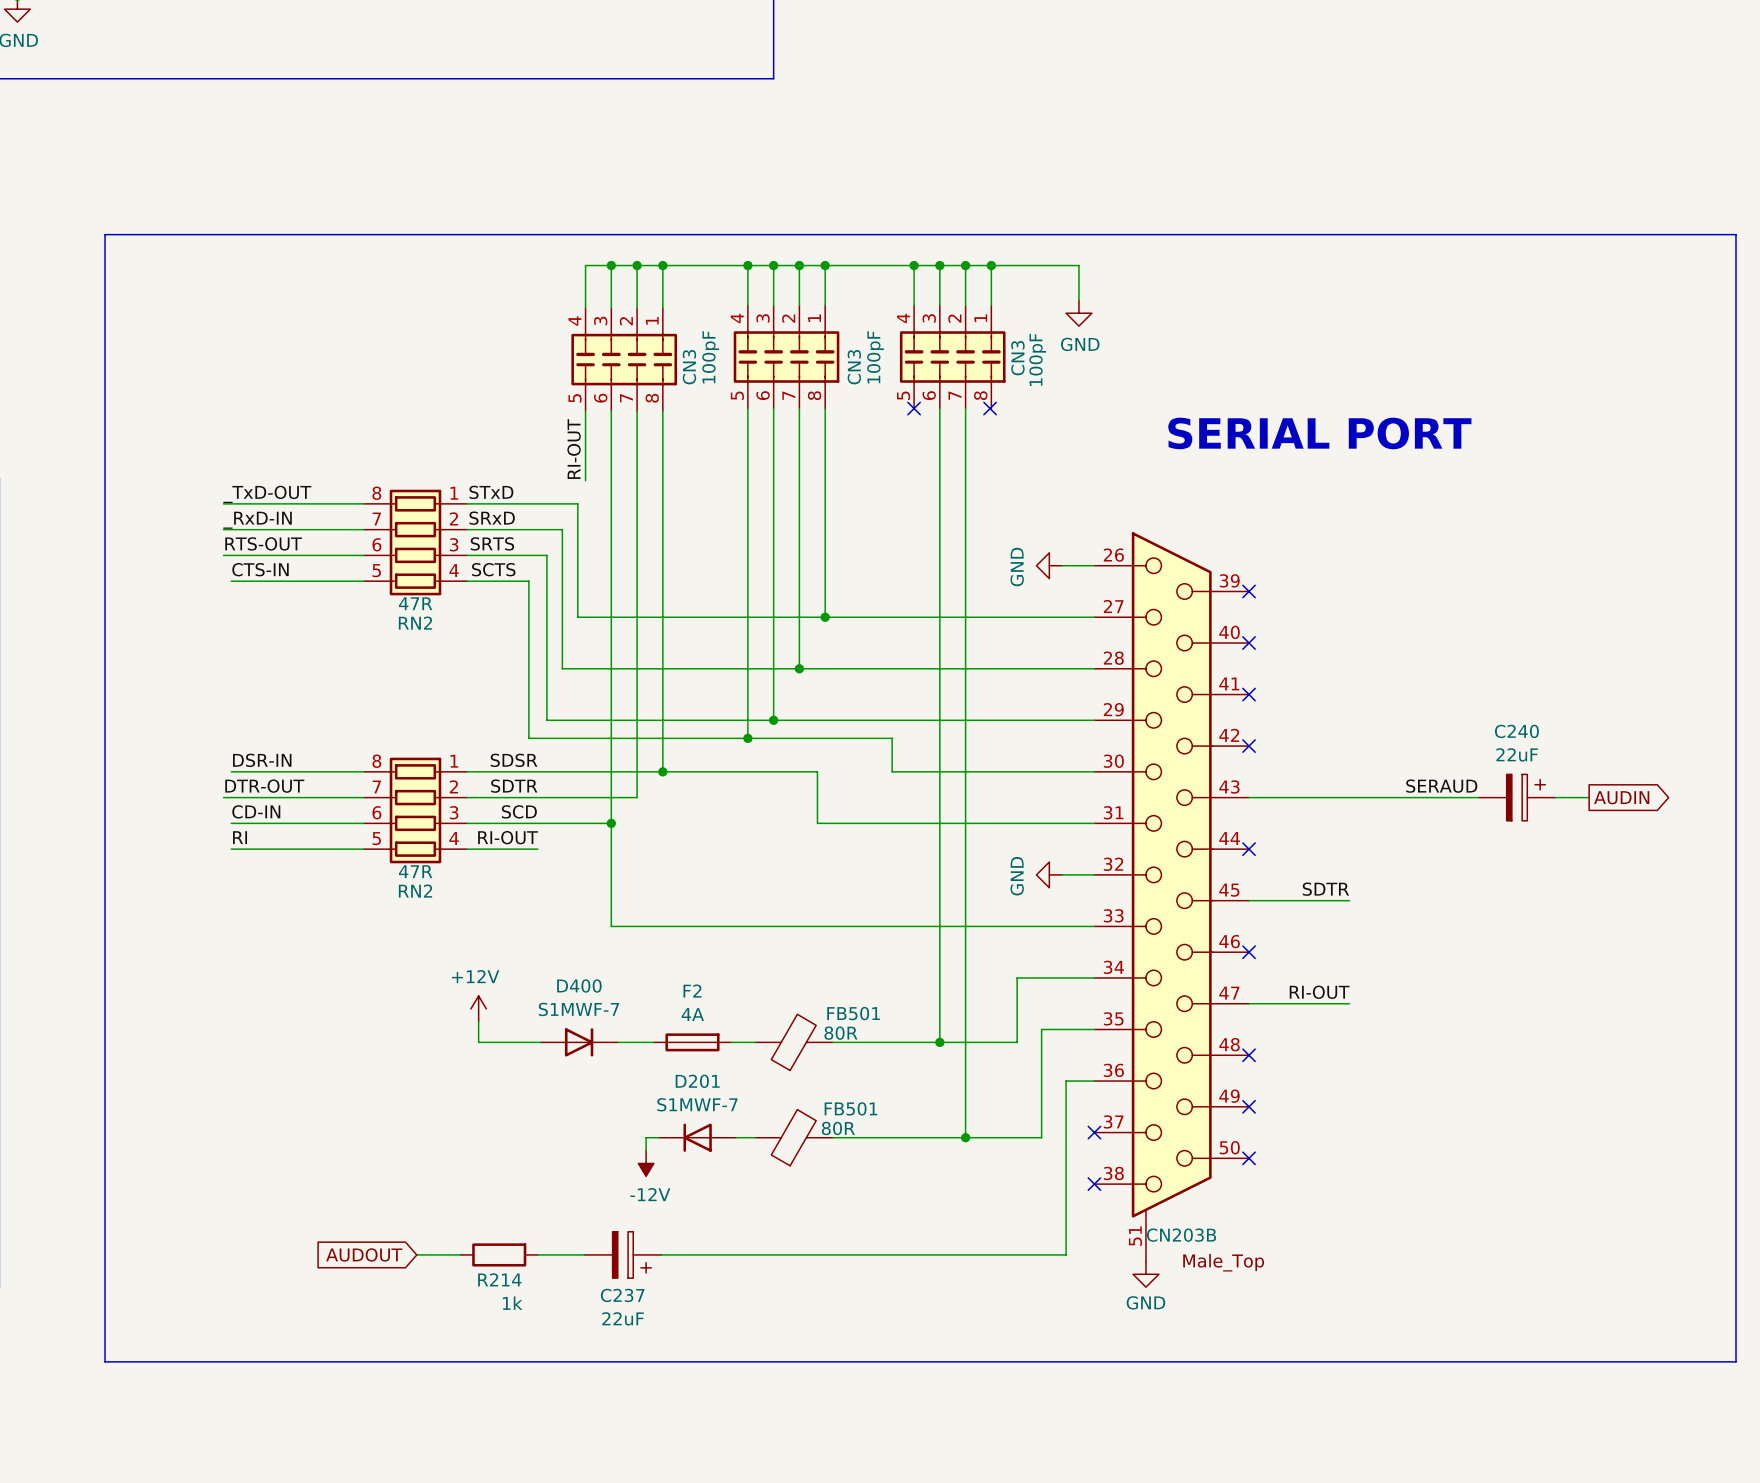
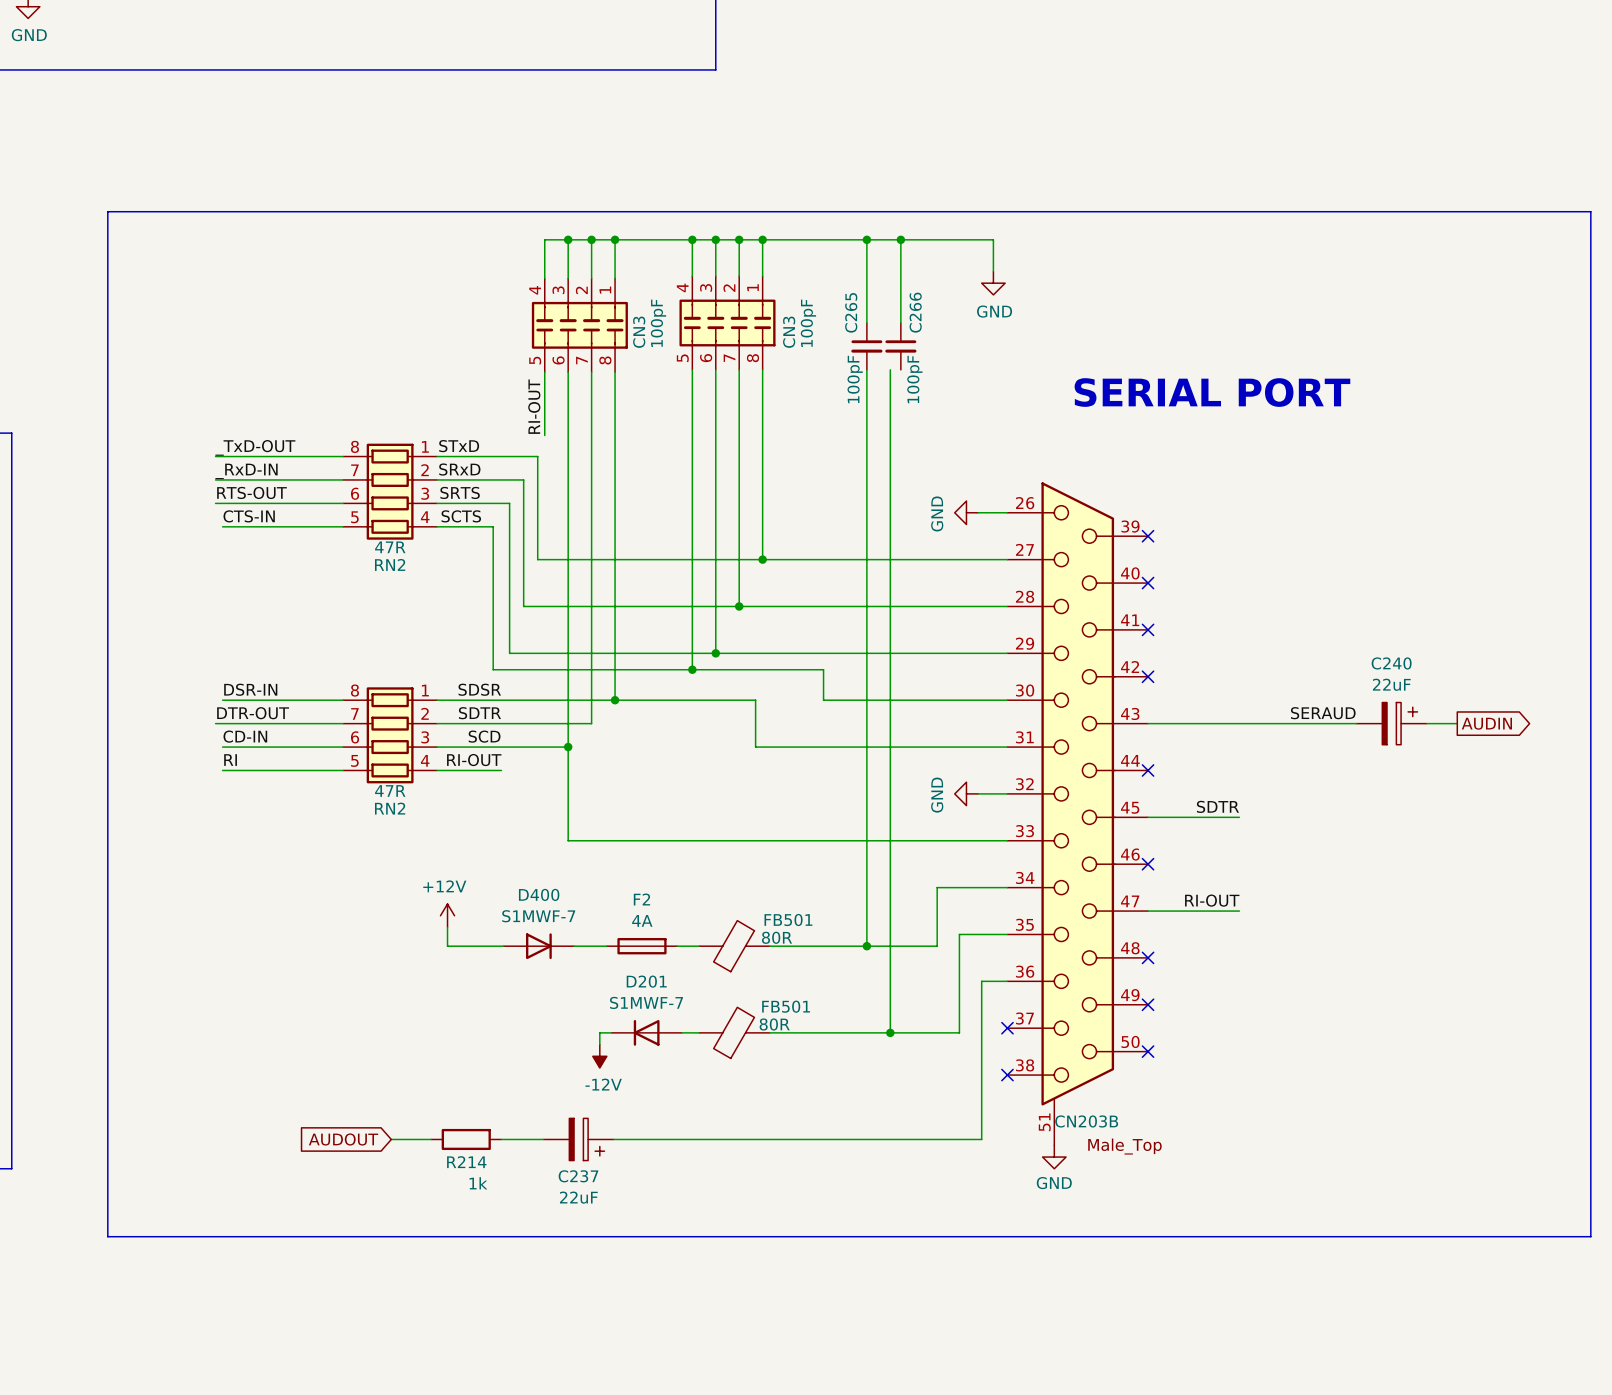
wire: (914, 265) (914, 305) -> none
junction: (914, 265) -> none
wire: (965, 265) (965, 305) -> none
junction: (965, 265) -> none
wire: none -> (900, 239) (900, 323)
junction: none -> (900, 239)
wire: (991, 265) (991, 305) -> none
junction: (991, 265) -> none
CN3: 100pF (952, 357) -> none
C265: none -> 100pF (866, 346)
C266: none -> 100pF (900, 346)
no-connect mark: (914, 408) -> none
no-connect mark: (990, 408) -> none

